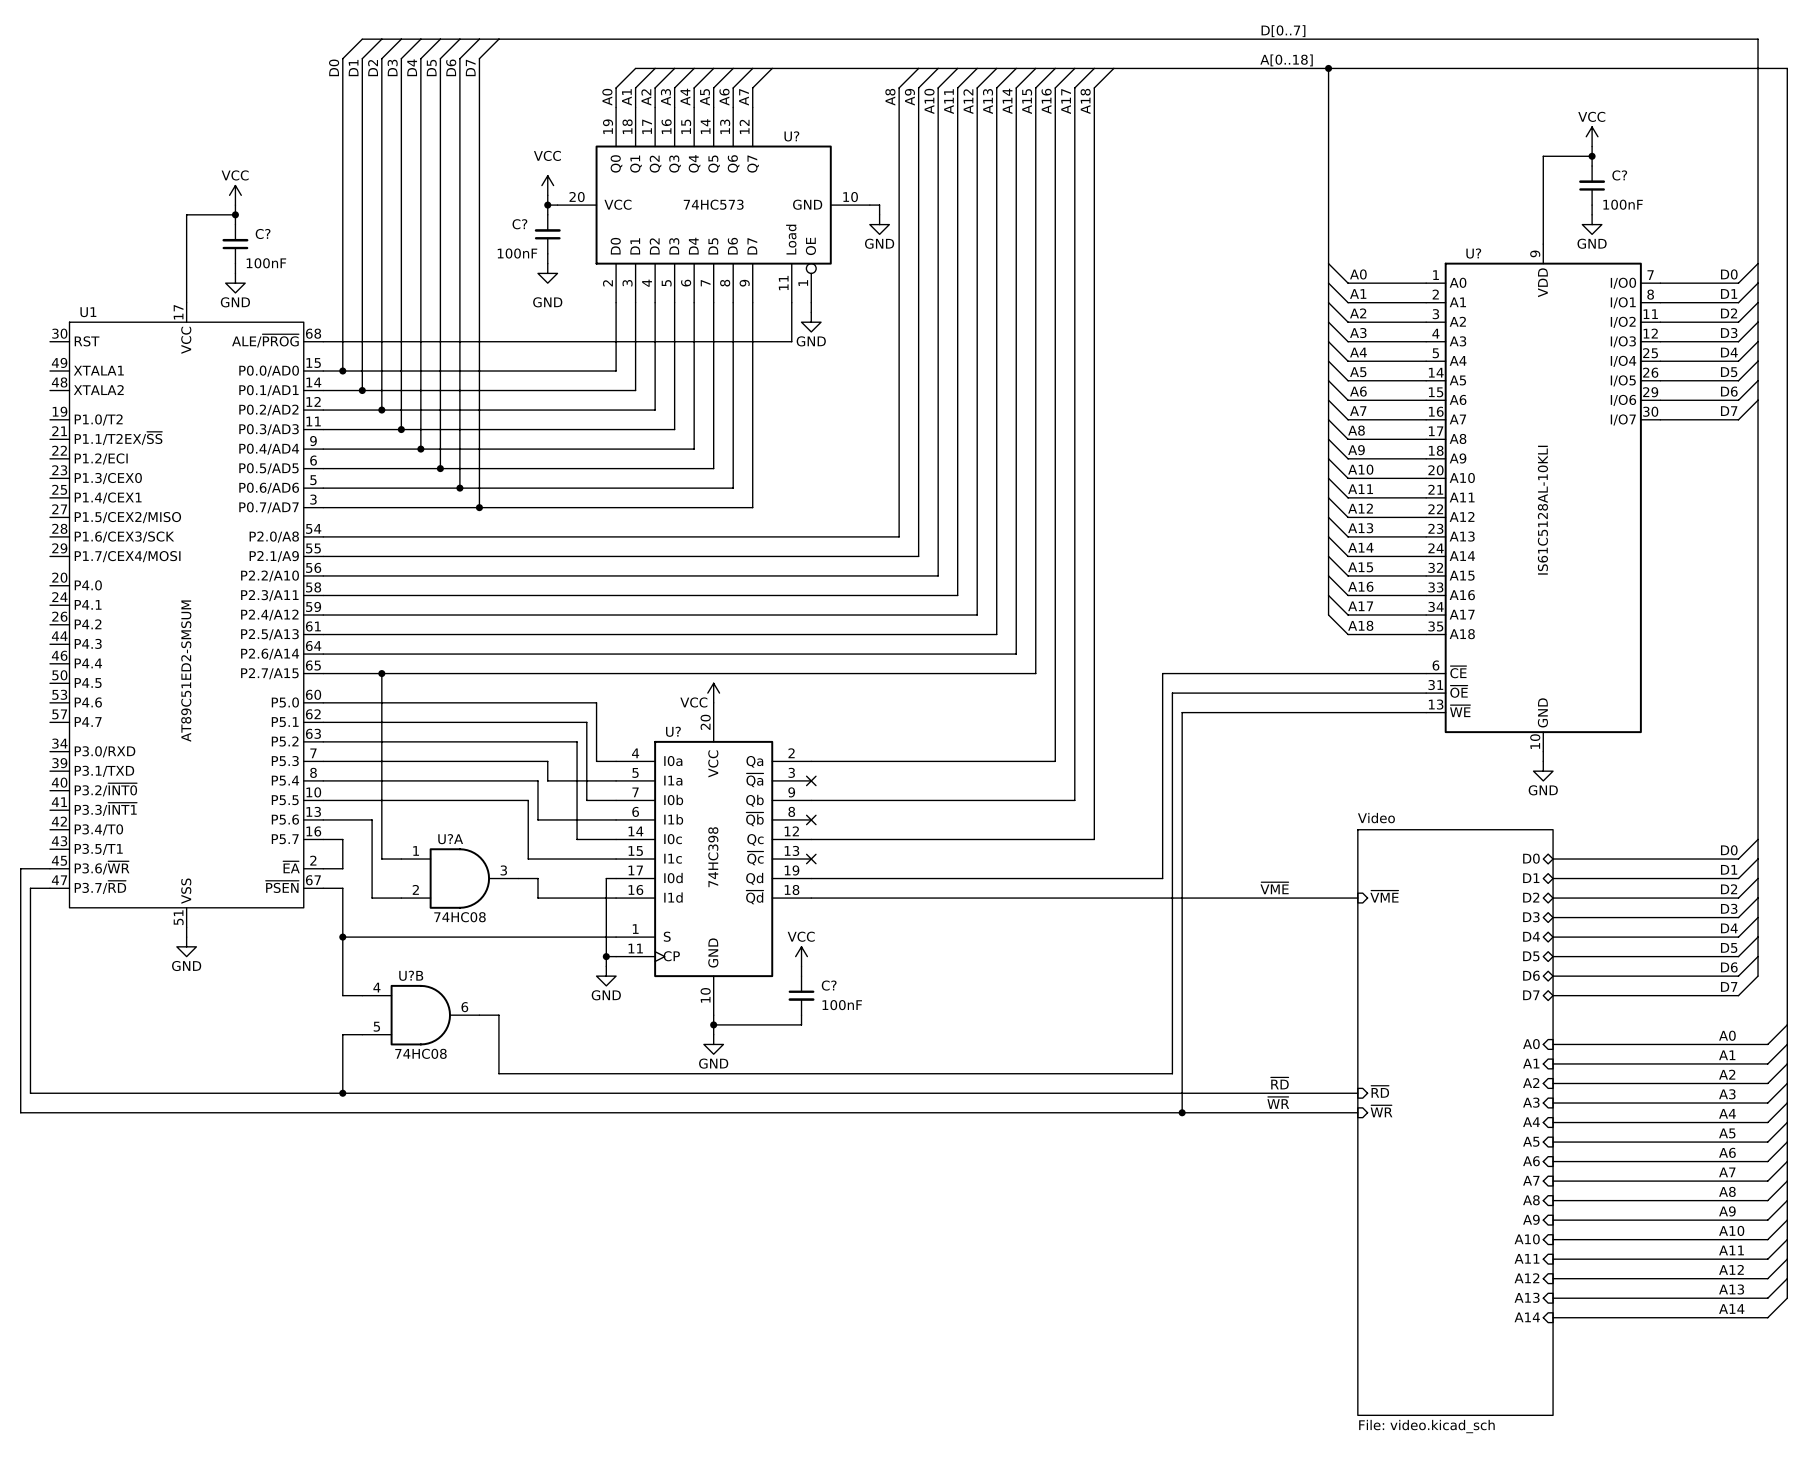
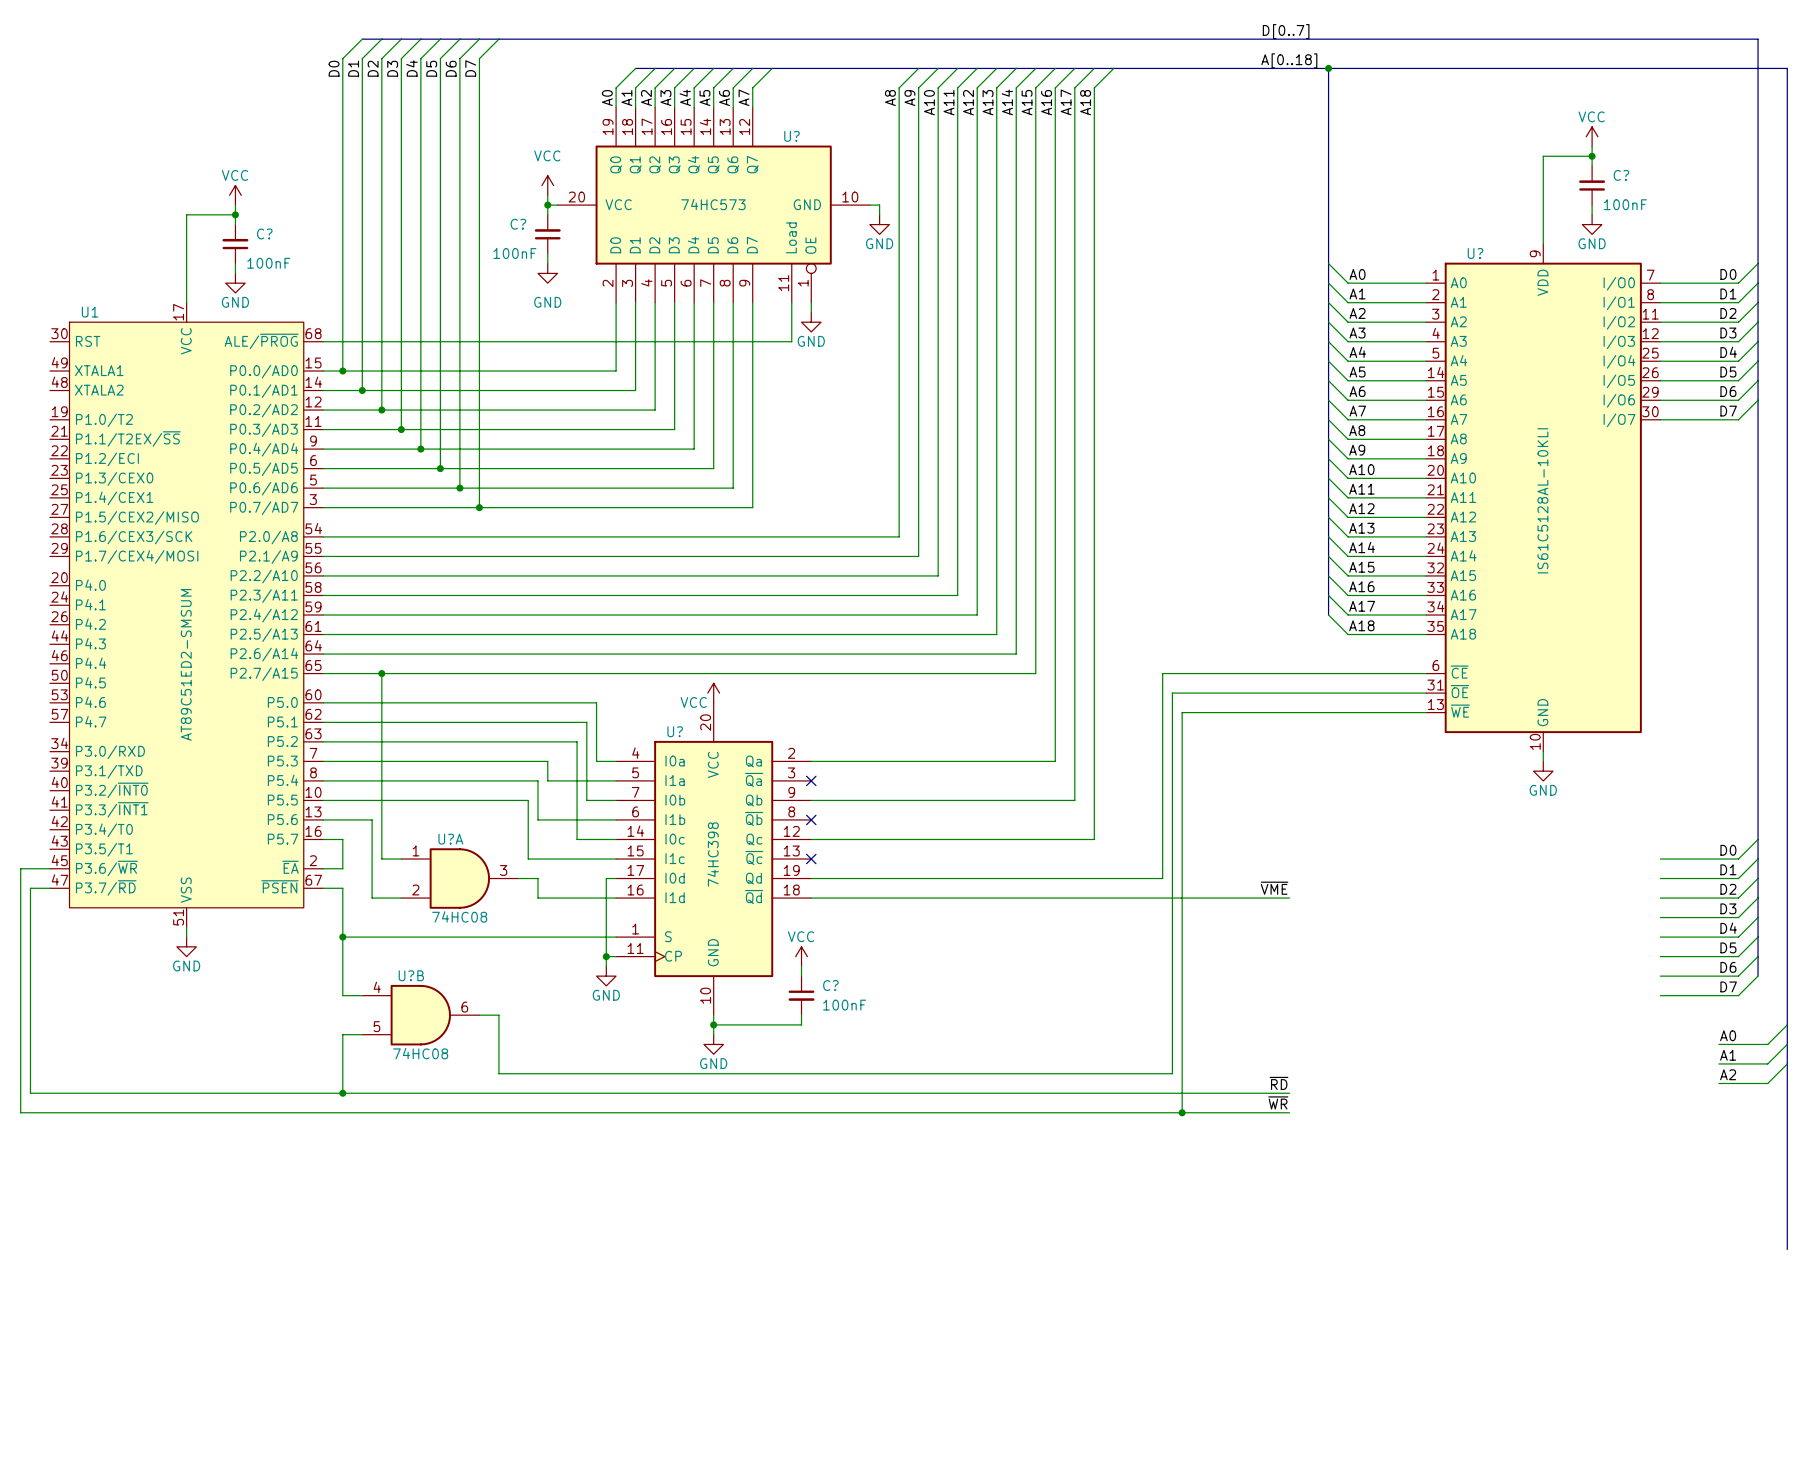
sheet pin: D0 (1531, 858) -> none
wire: (1553, 859) (1660, 859) -> none
sheet pin: D1 (1531, 878) -> none
wire: (1553, 878) (1660, 878) -> none
sheet pin: ~{VME} (1384, 896) -> none
sheet pin: D2 (1531, 897) -> none
wire: (1289, 898) (1357, 898) -> none
wire: (1553, 898) (1660, 898) -> none
sheet pin: D3 (1531, 917) -> none
wire: (1553, 917) (1660, 917) -> none
sheet pin: D4 (1531, 936) -> none
wire: (1553, 937) (1660, 937) -> none
sheet pin: D5 (1531, 956) -> none
wire: (1553, 956) (1660, 956) -> none
sheet pin: D6 (1531, 975) -> none
wire: (1553, 976) (1660, 976) -> none
sheet pin: D7 (1531, 995) -> none
wire: (1553, 995) (1660, 995) -> none
sheet pin: A0 (1531, 1044) -> none
wire: (1553, 1044) (1718, 1044) -> none
sheet pin: A1 (1531, 1063) -> none
wire: (1553, 1063) (1718, 1063) -> none
sheet pin: A2 (1531, 1083) -> none
wire: (1553, 1083) (1718, 1083) -> none
wire: (1787, 1083) (1767, 1103) (1553, 1103) -> none
sheet pin: ~{RD} (1380, 1091) -> none
wire: (1289, 1093) (1357, 1093) -> none
label: A3 (1727, 1094) -> none
sheet pin: A3 (1531, 1102) -> none
wire: (1787, 1103) (1767, 1122) (1553, 1122) -> none
sheet pin: ~{WR} (1381, 1111) -> none
wire: (1289, 1112) (1357, 1112) -> none
label: A4 (1727, 1113) -> none
sheet Video: File: video.kicad_sch (1455, 1122) -> none
sheet pin: A4 (1531, 1122) -> none
wire: (1787, 1122) (1767, 1142) (1553, 1142) -> none
label: A5 (1727, 1133) -> none
sheet pin: A5 (1531, 1141) -> none
wire: (1787, 1142) (1767, 1161) (1553, 1161) -> none
label: A6 (1727, 1152) -> none
sheet pin: A6 (1531, 1161) -> none
wire: (1787, 1161) (1767, 1181) (1553, 1181) -> none
label: A7 (1727, 1172) -> none
sheet pin: A7 (1531, 1180) -> none
wire: (1787, 1181) (1767, 1200) (1553, 1200) -> none
label: A8 (1727, 1191) -> none
sheet pin: A8 (1531, 1200) -> none
wire: (1787, 1200) (1767, 1220) (1553, 1220) -> none
label: A9 (1727, 1211) -> none
sheet pin: A9 (1531, 1219) -> none
wire: (1787, 1220) (1767, 1239) (1553, 1239) -> none
label: A10 (1731, 1230) -> none
sheet pin: A10 (1527, 1239) -> none
wire: (1787, 1239) (1767, 1259) (1553, 1259) -> none
bus: (1787, 1249) (1787, 1298) -> none
label: A11 (1731, 1250) -> none
sheet pin: A11 (1526, 1258) -> none
wire: (1787, 1259) (1767, 1278) (1553, 1278) -> none
label: A12 (1731, 1269) -> none
sheet pin: A12 (1526, 1278) -> none
wire: (1787, 1278) (1767, 1298) (1553, 1298) -> none
label: A13 (1731, 1289) -> none
sheet pin: A13 (1527, 1297) -> none
wire: (1787, 1298) (1767, 1317) (1553, 1317) -> none
label: A14 (1731, 1309) -> none
sheet pin: A14 (1527, 1317) -> none

